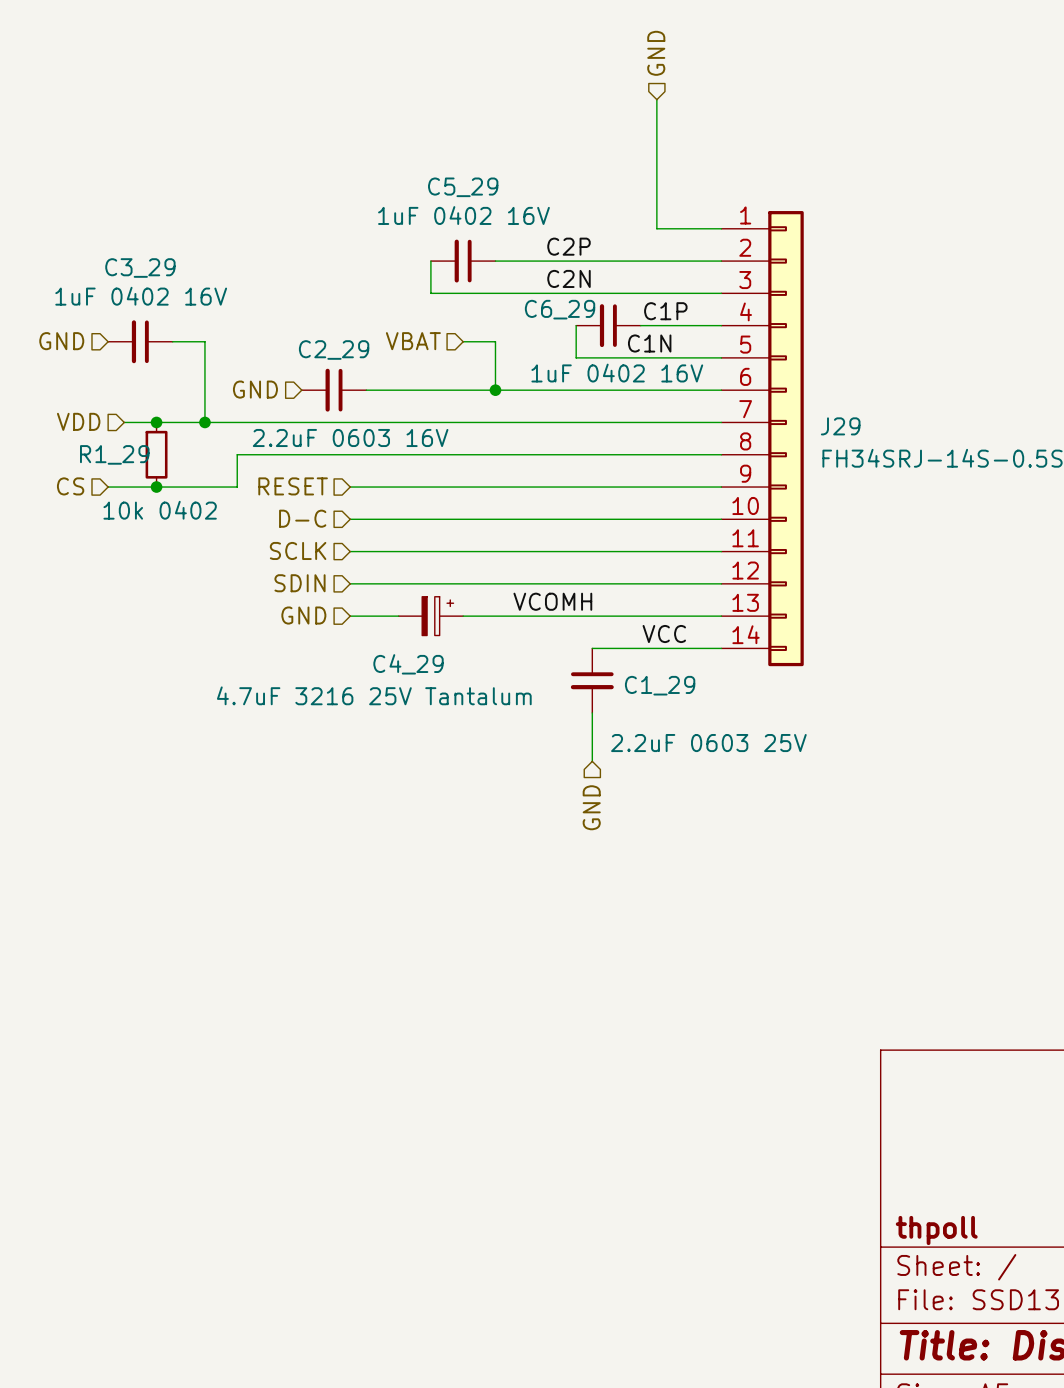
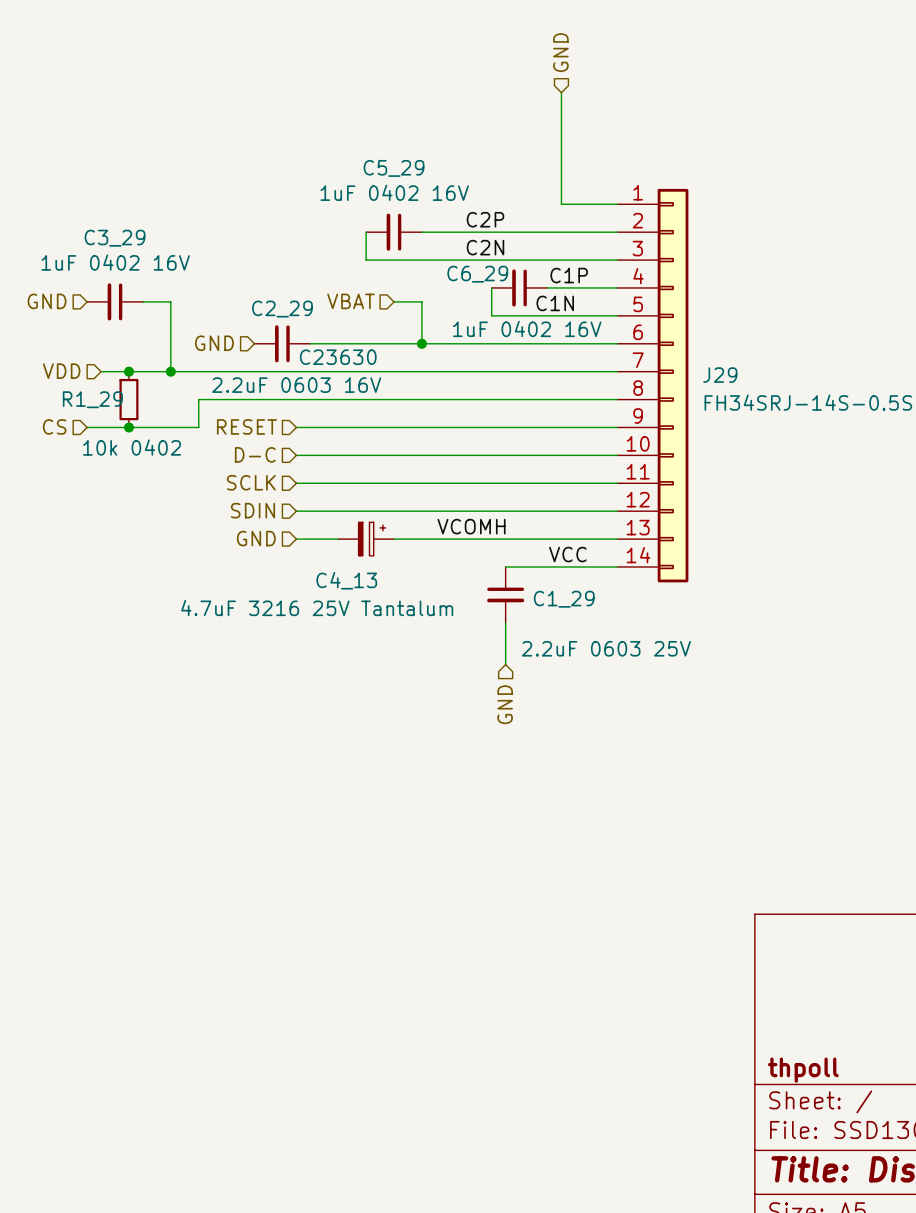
C2_29 text: none -> C23630 (338, 357)
C4_29 name: C4_29 (408, 664) -> C4_13 (346, 580)

